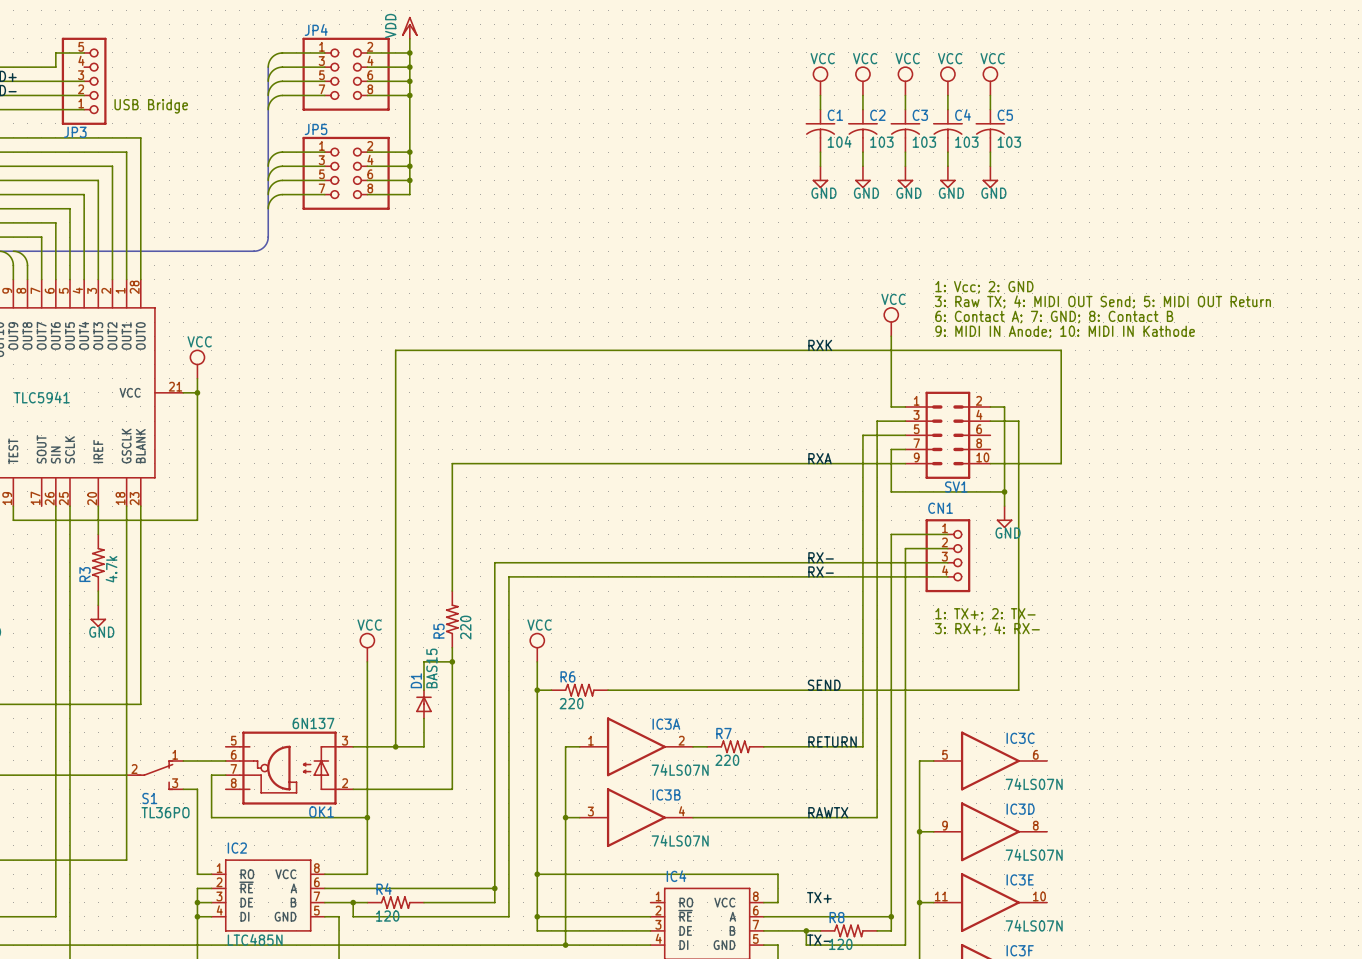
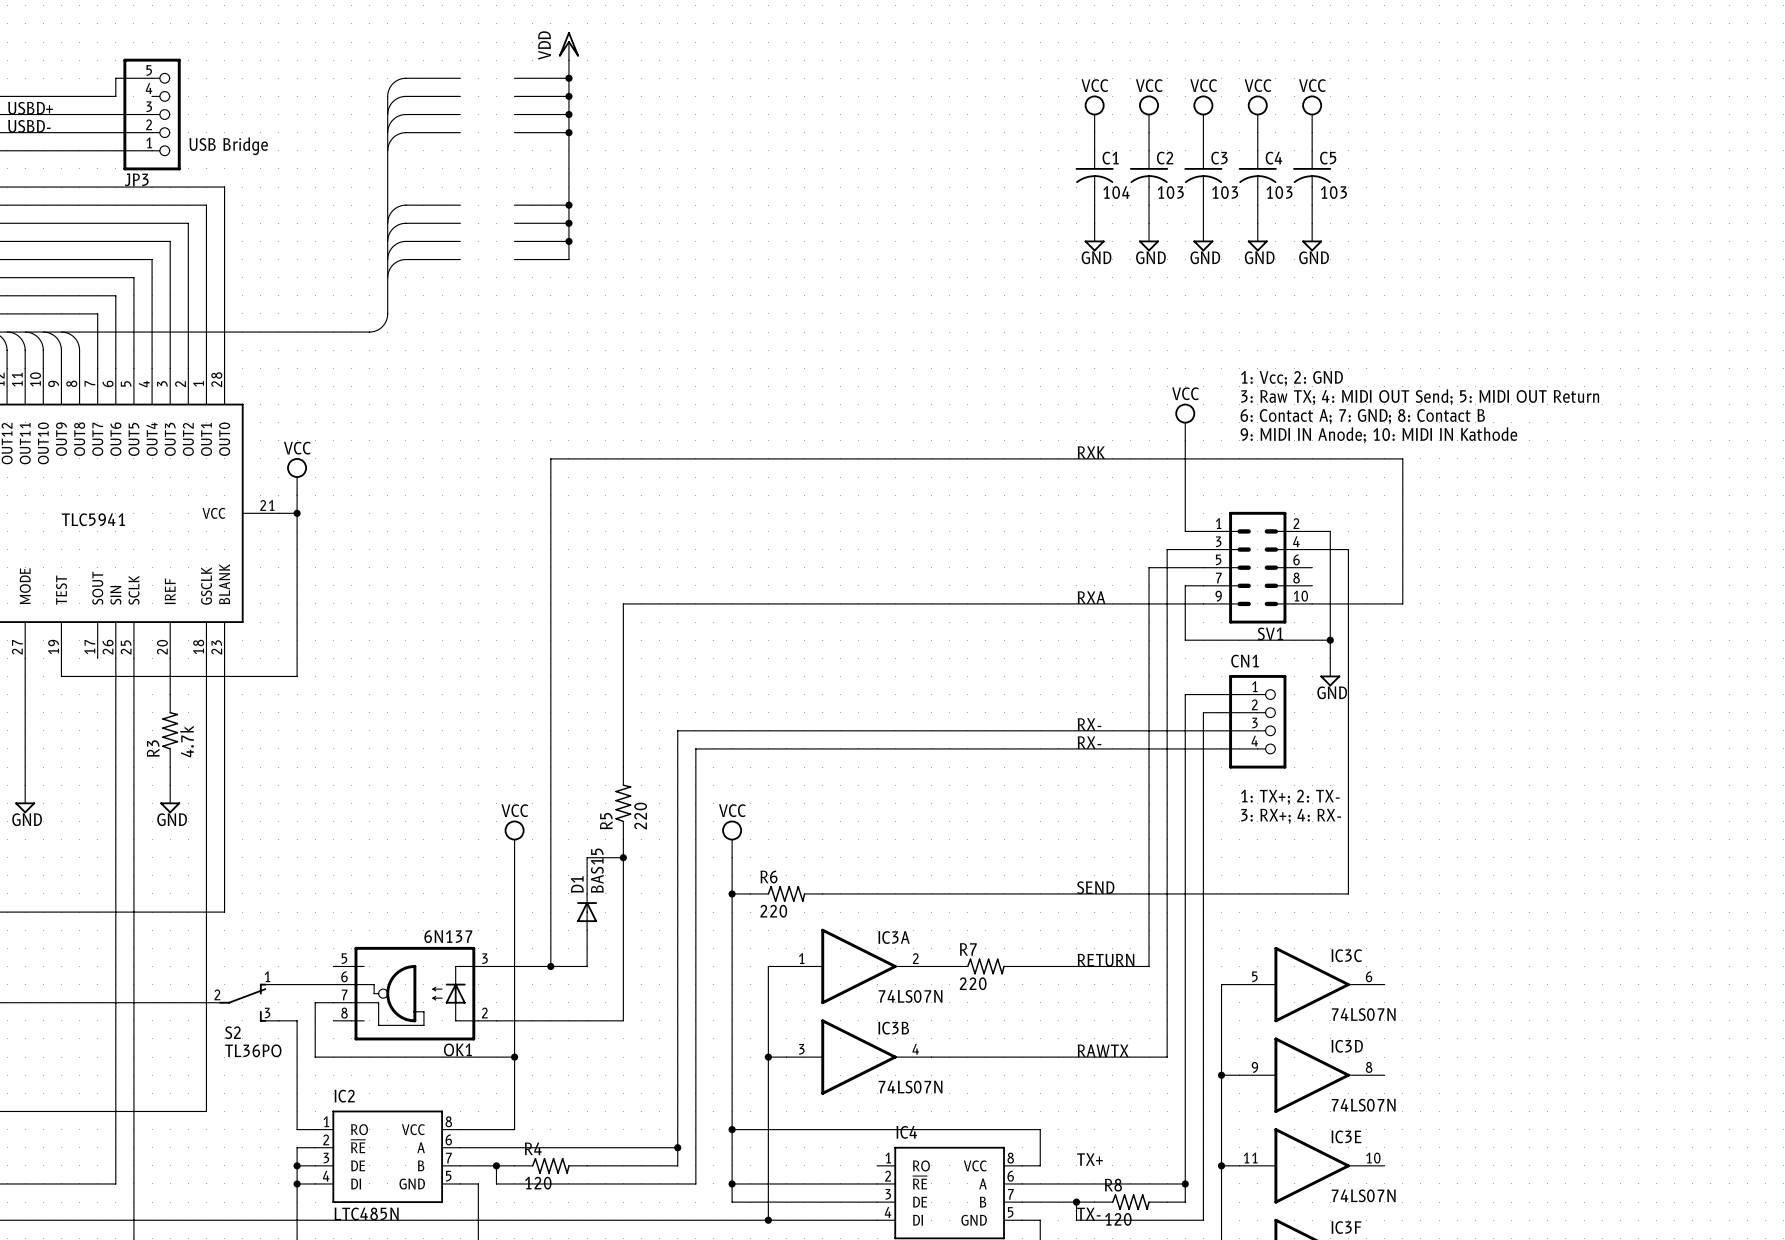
JP4: (346, 74) -> none
JP5: (346, 173) -> none
S1 name: S1 (149, 798) -> S2 (232, 1032)

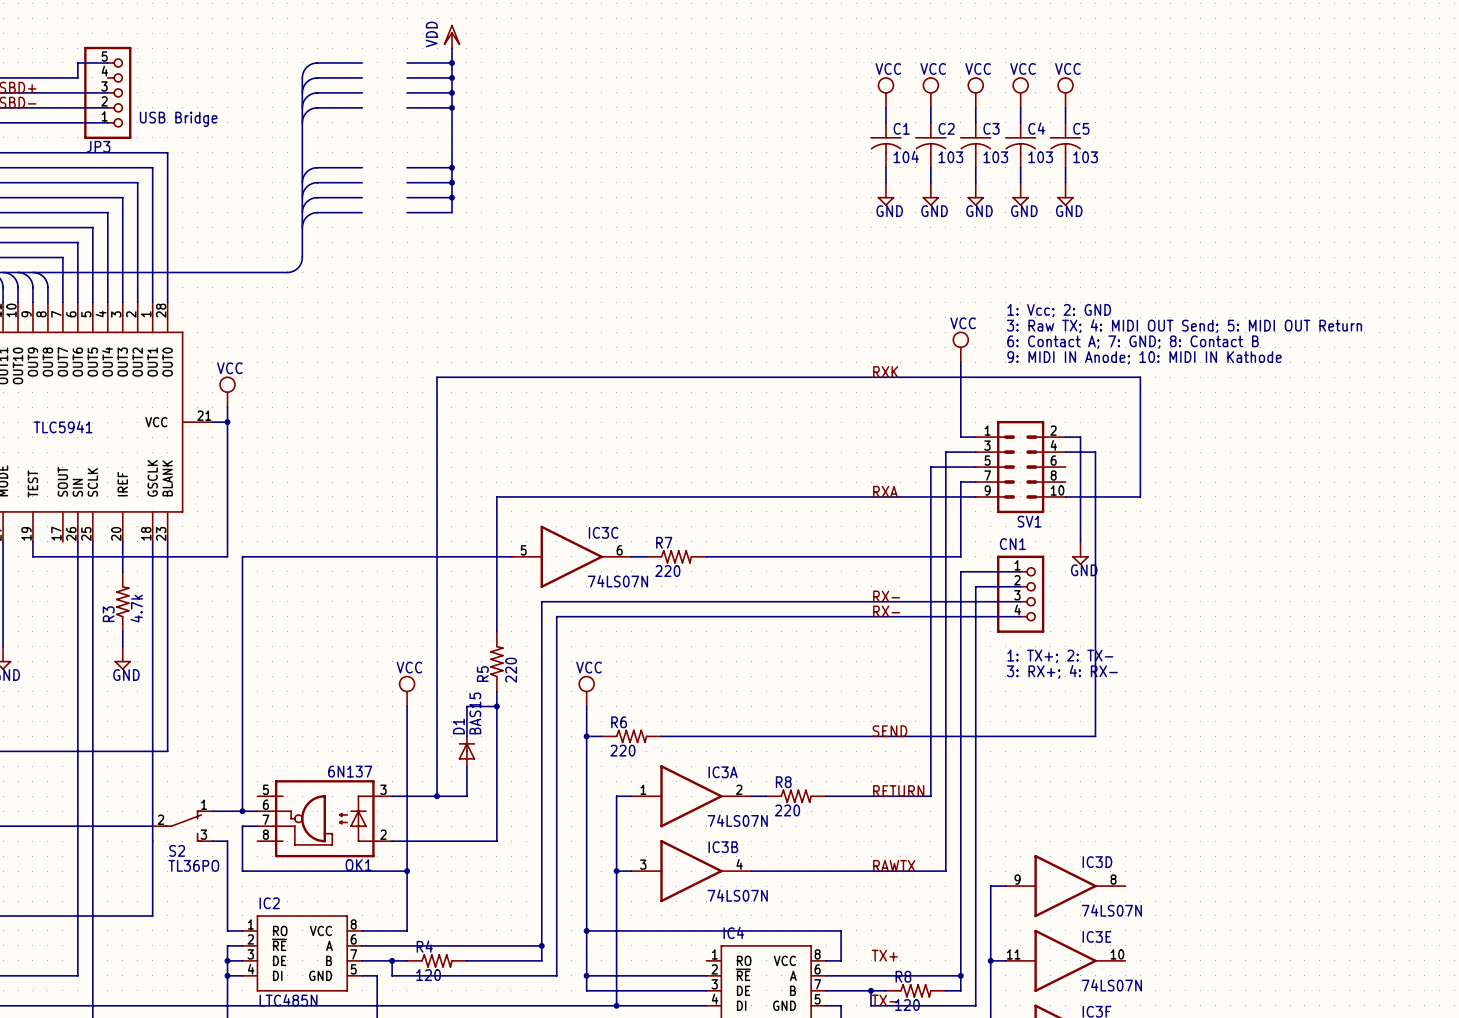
wire: (1185, 640) (1330, 640) -> (960, 526) (960, 556) (706, 556)
junction: (1330, 640) -> none
wire: none -> (511, 556) (242, 556) (242, 811)
wire: none -> (631, 556) (646, 556)
R7: none -> 220 (676, 556)
R7 name: R7 (968, 949) -> R8 (783, 782)
junction: none -> (242, 811)
wire: (1239, 984) (1221, 984) (1221, 1075) -> none
IC3C position: (1312, 984) -> (571, 556)
junction: (1221, 1075) -> none

